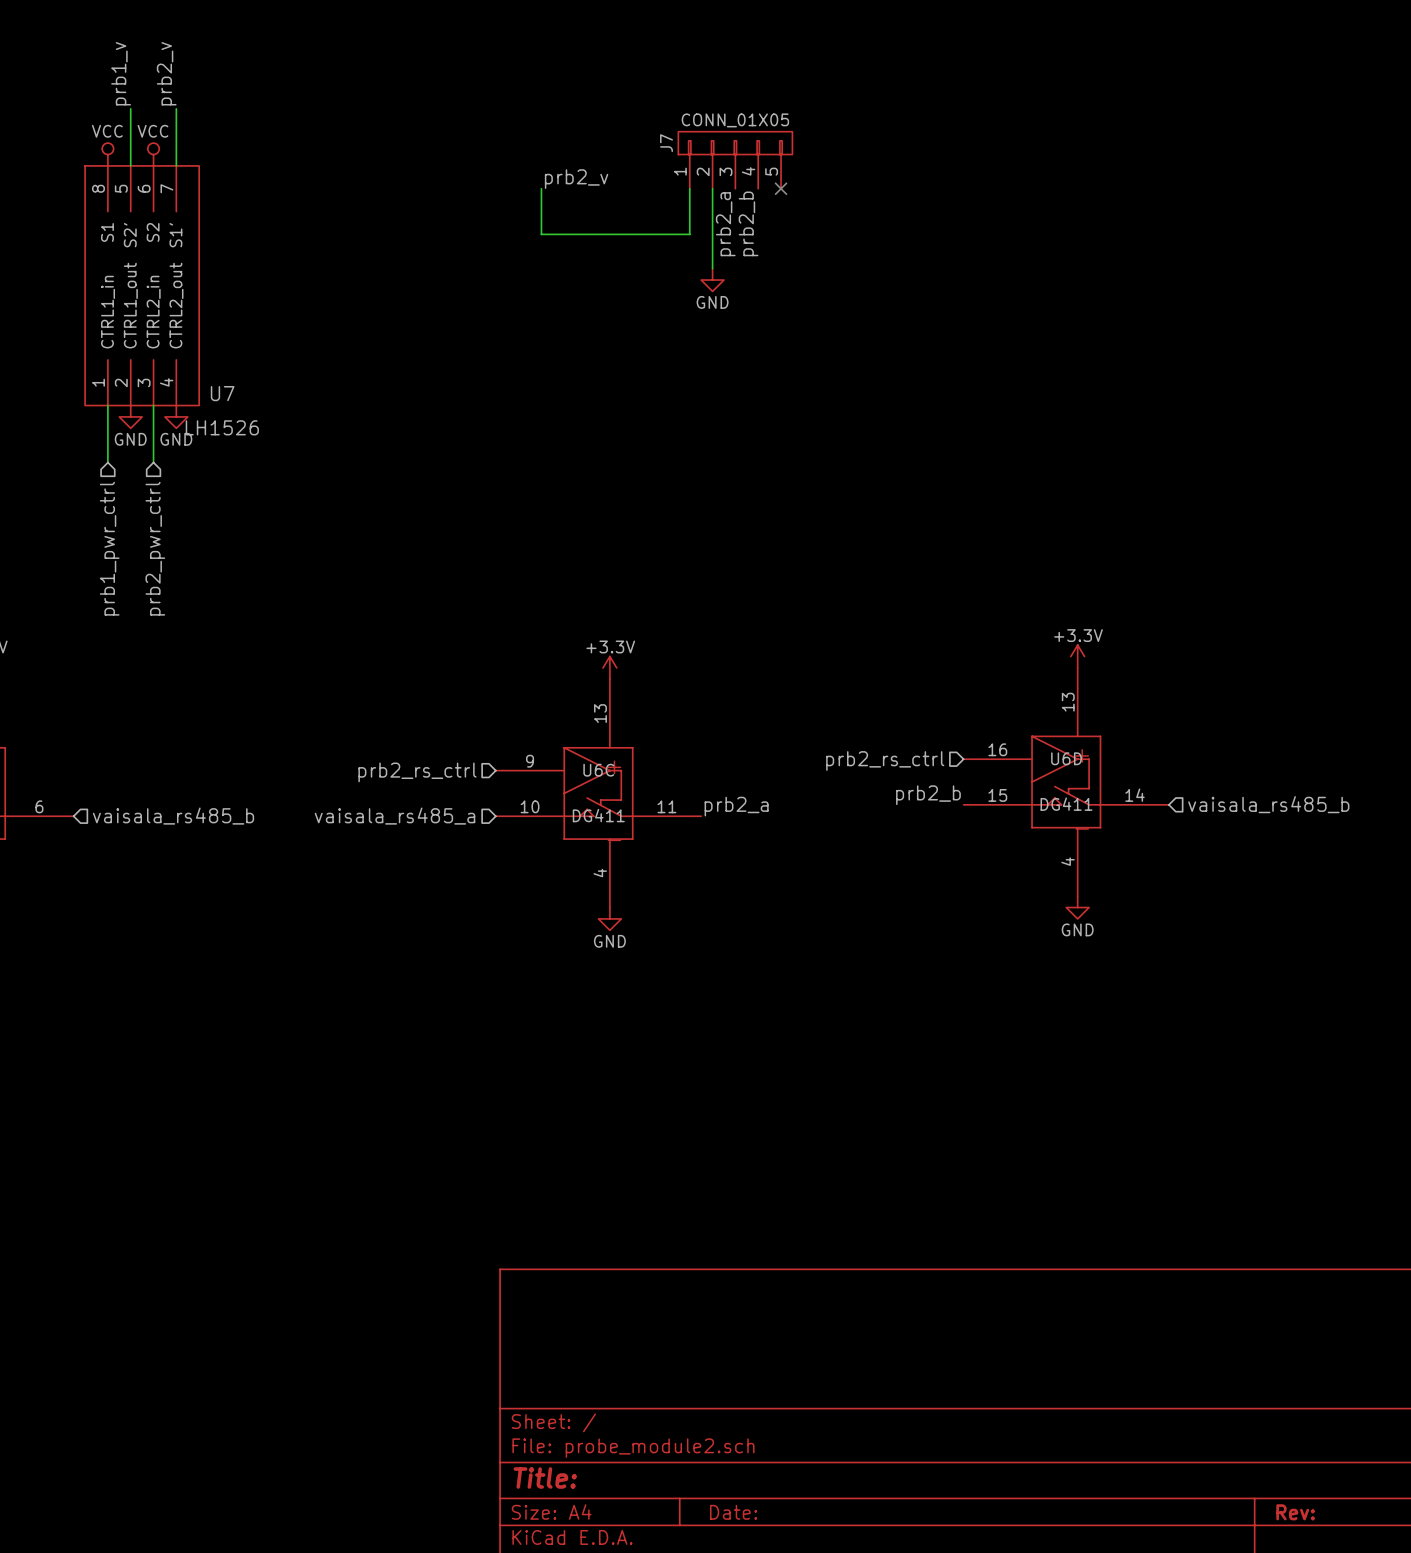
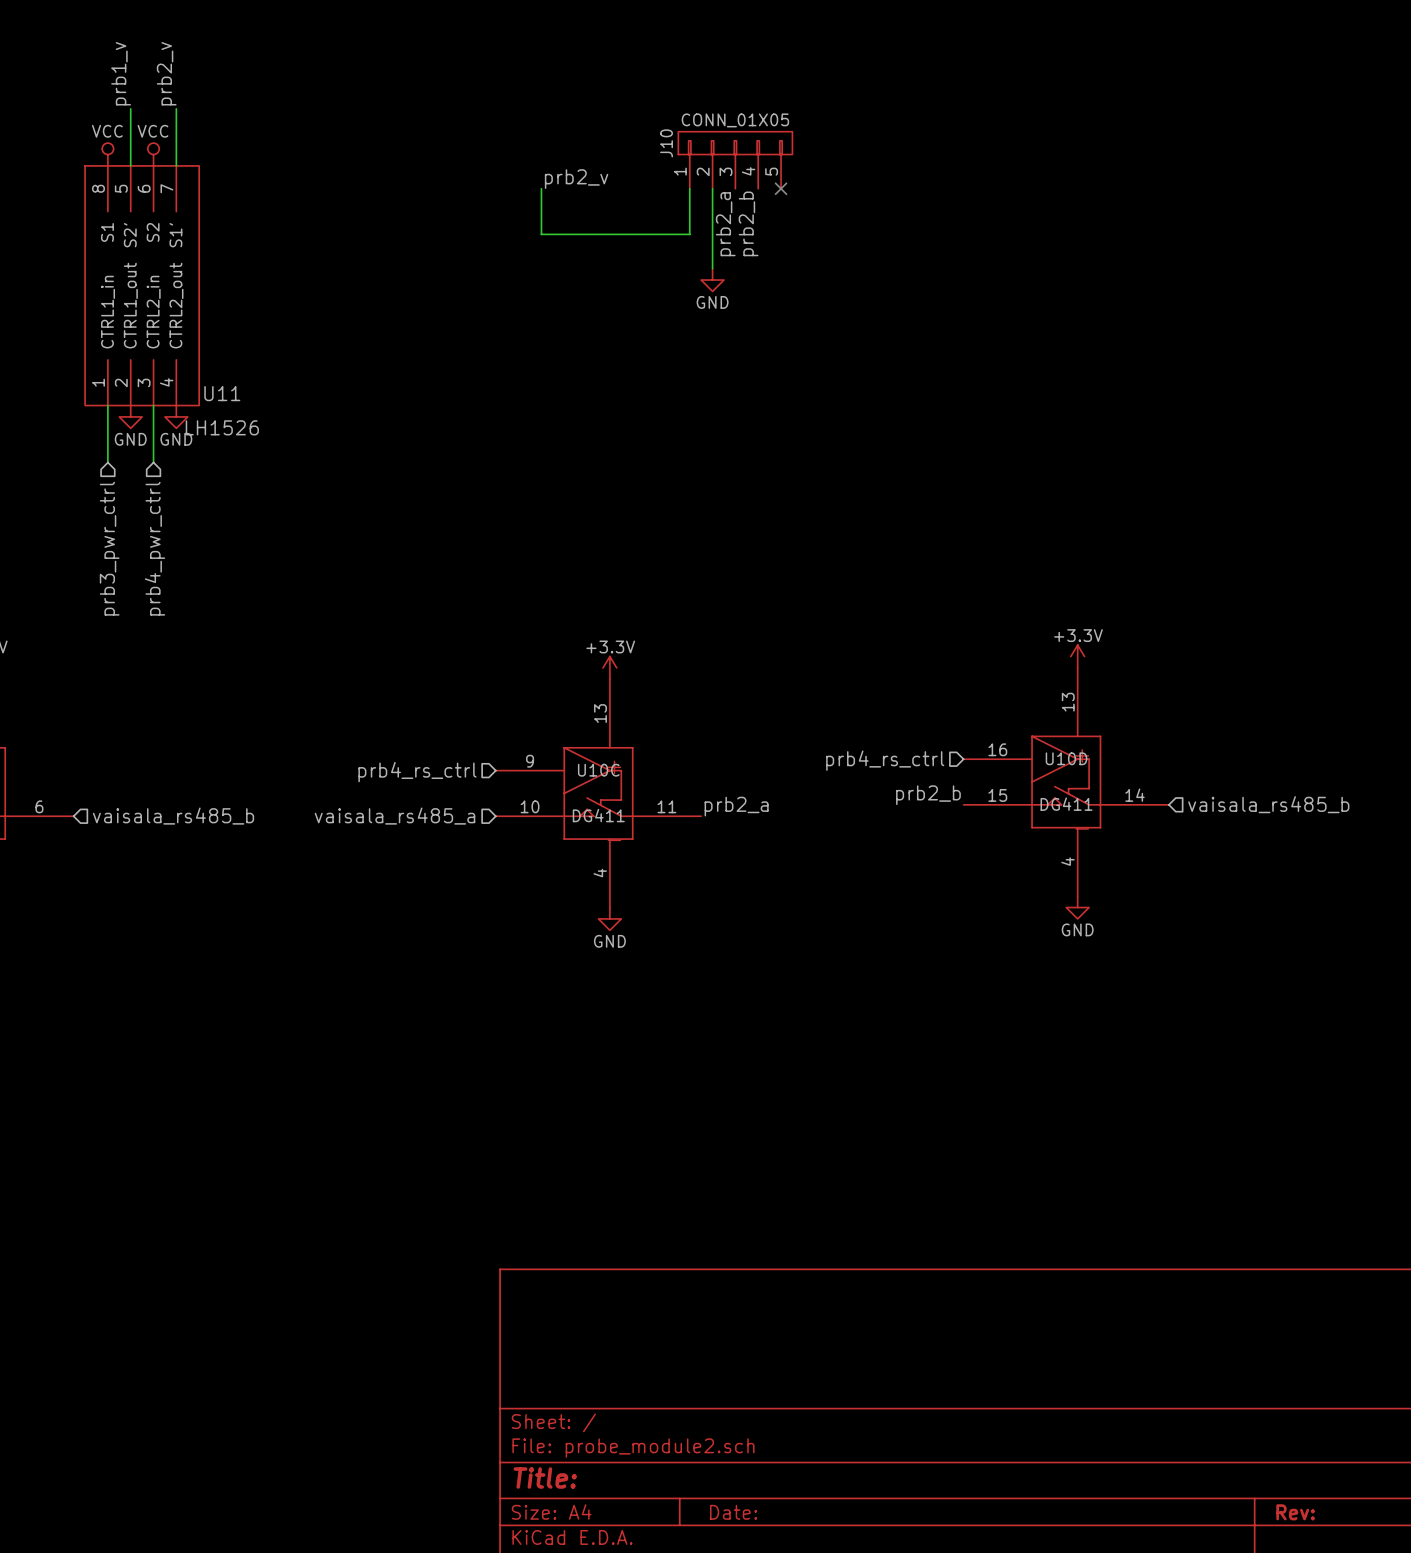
J7 name: J7 (666, 143) -> J10 (666, 143)
U7 name: U7 (222, 393) -> U11 (222, 393)
hierarchical label: prb1_pwr_ctrl (109, 548) -> prb3_pwr_ctrl (109, 548)
hierarchical label: prb2_pwr_ctrl (155, 548) -> prb4_pwr_ctrl (154, 548)
U6D name: U6D (1066, 758) -> U10D (1066, 758)
hierarchical label: prb2_rs_ctrl (885, 760) -> prb4_rs_ctrl (885, 760)
U6C name: U6C (598, 770) -> U10C (598, 770)
hierarchical label: prb2_rs_ctrl (417, 772) -> prb4_rs_ctrl (417, 772)

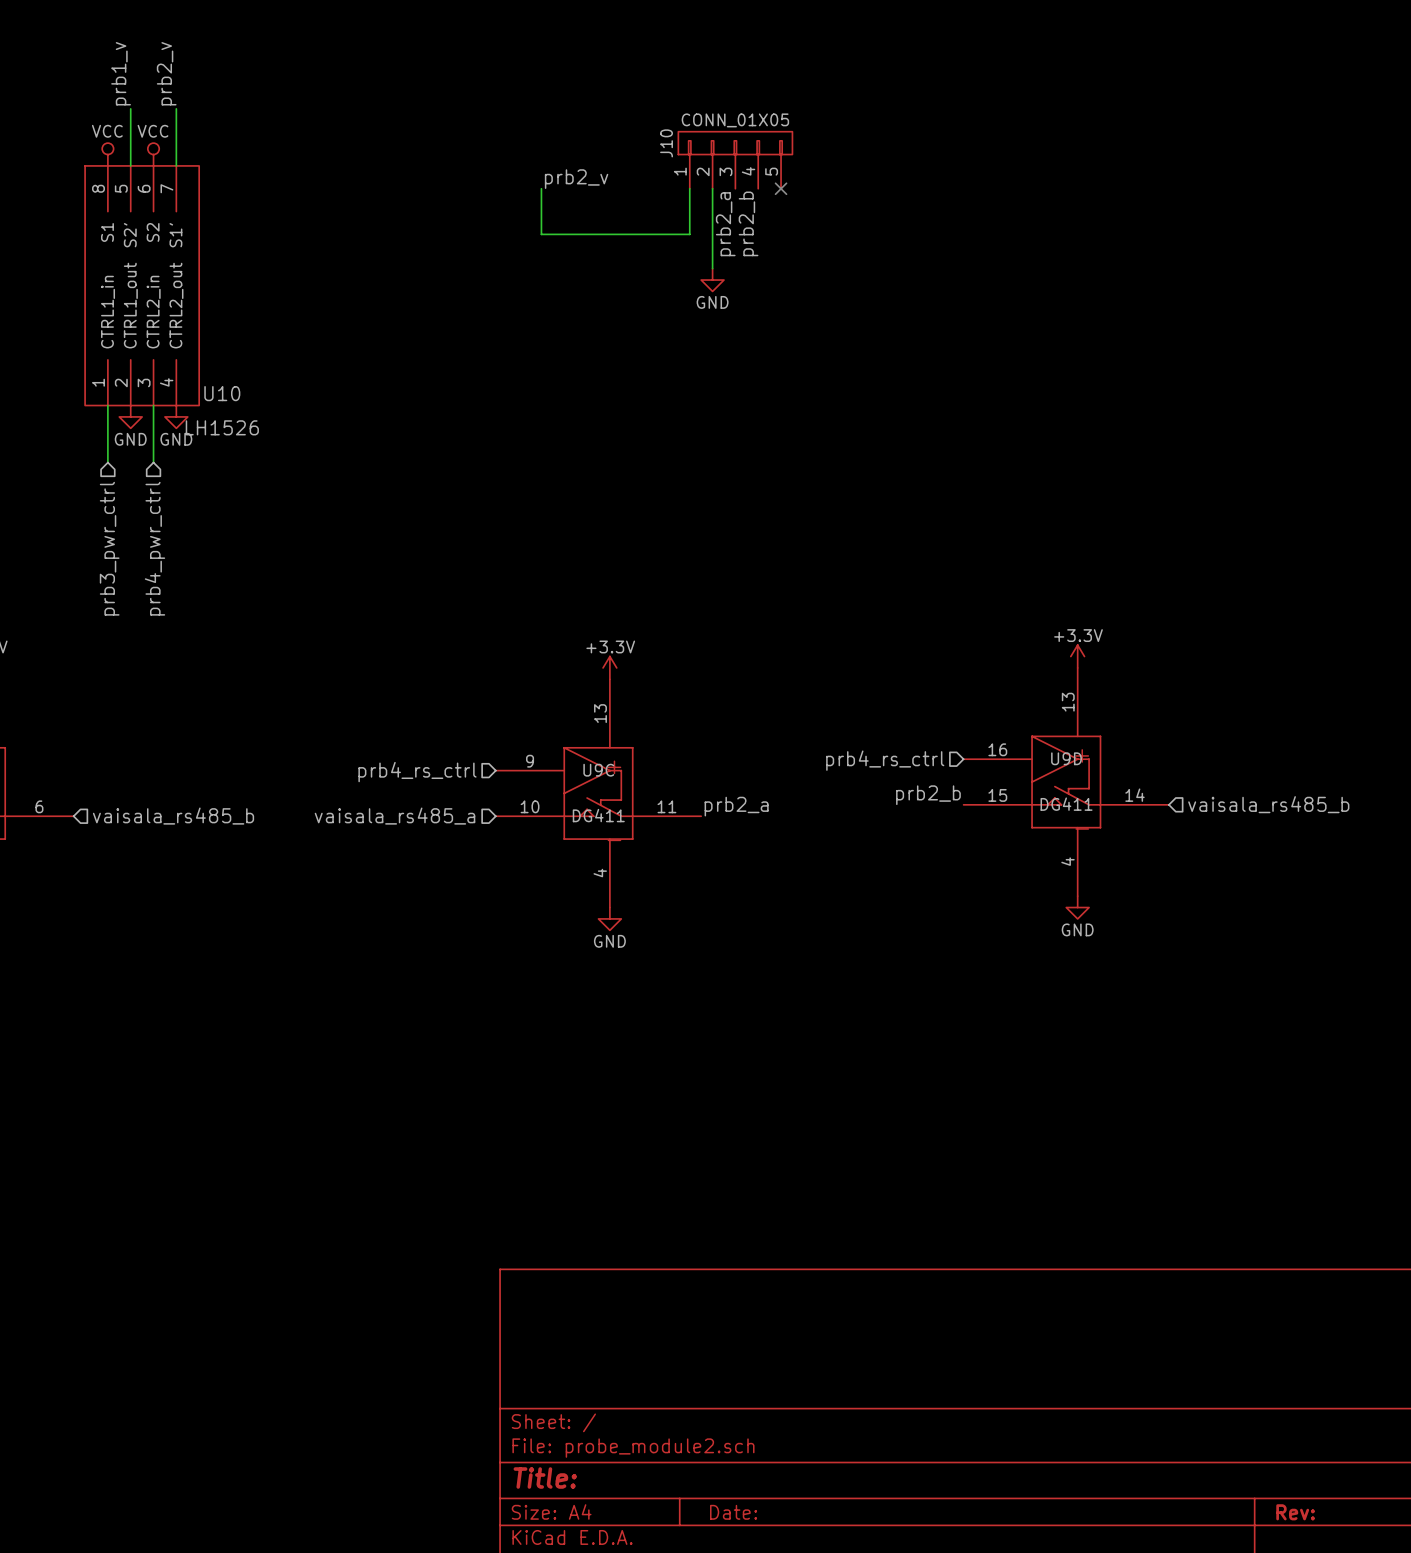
U11 name: U11 (222, 393) -> U10 (222, 393)
U10D name: U10D (1066, 758) -> U9D (1066, 758)
U10C name: U10C (598, 770) -> U9C (598, 770)

